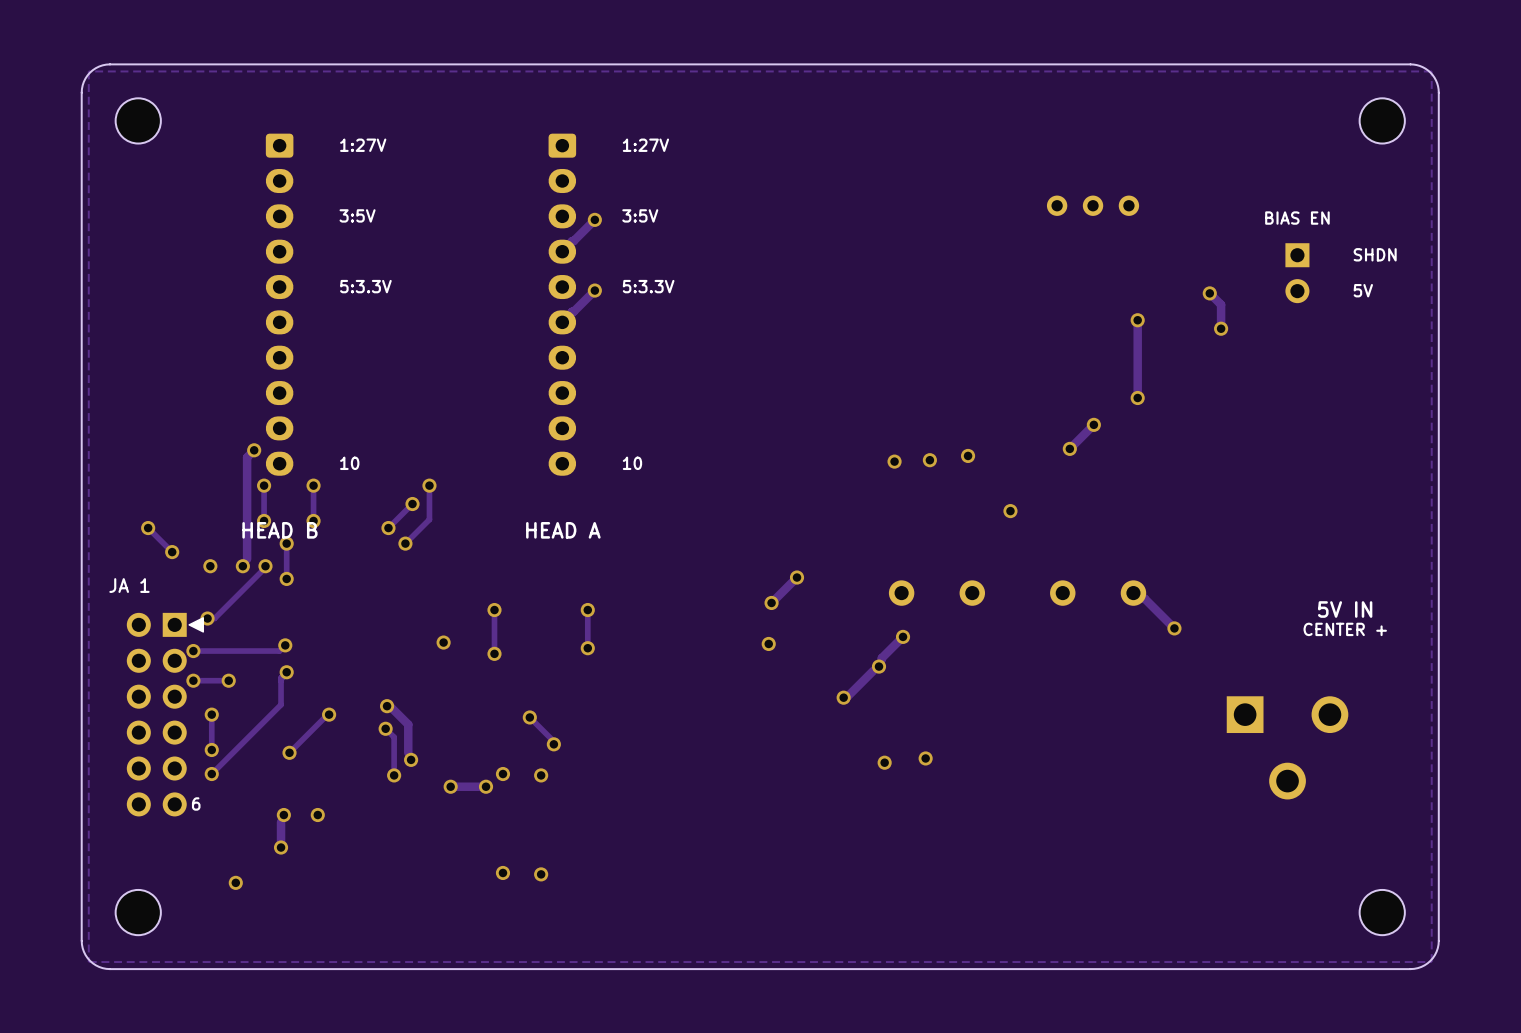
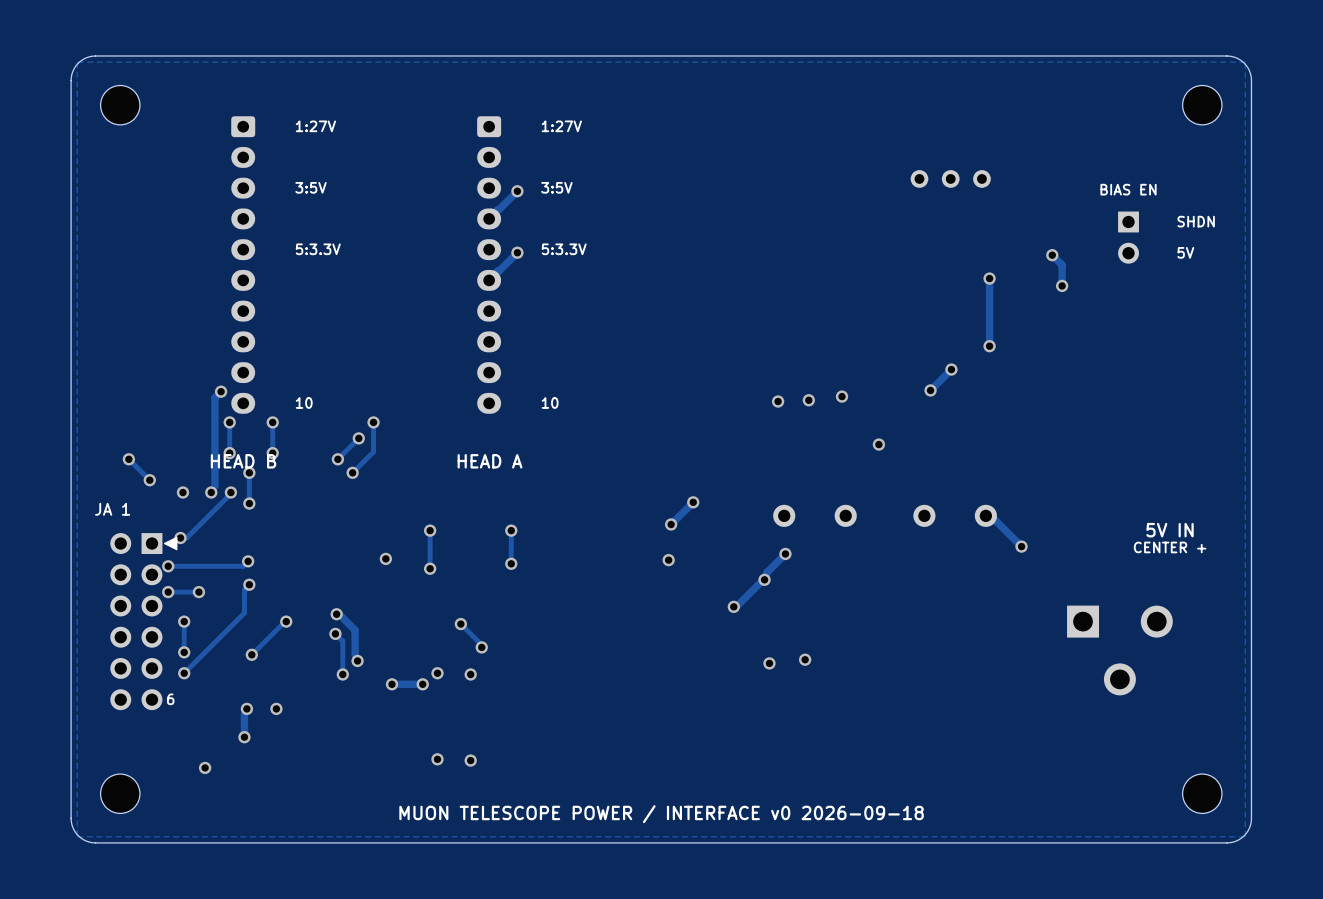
text: none -> MUON TELESCOPE POWER / INTERFACE v0 2026-09-18 (661, 814)

